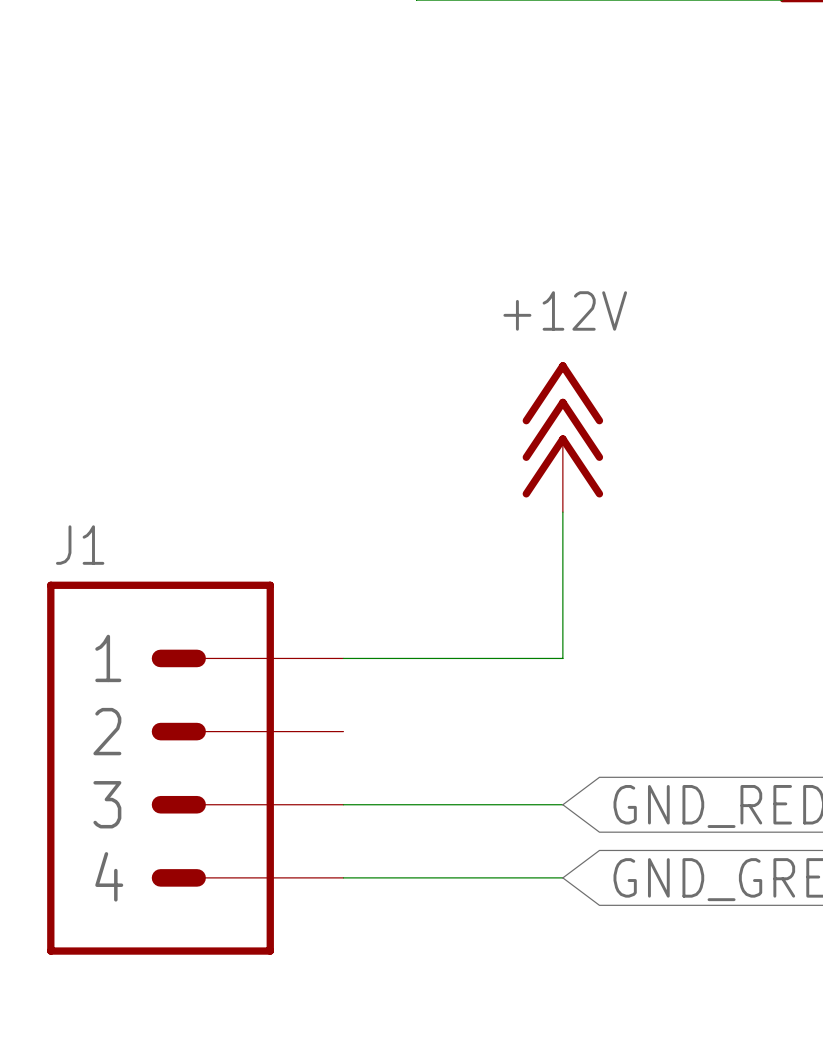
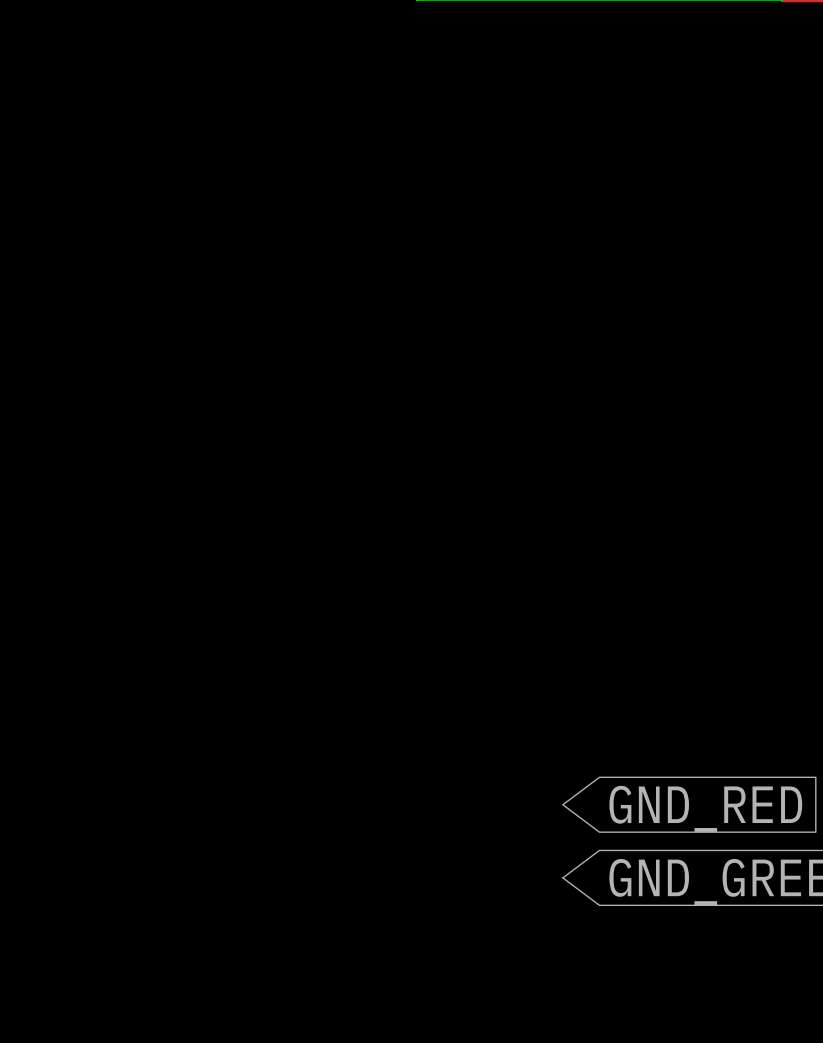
power symbol: +12V (562, 437) -> none
wire: (562, 512) (562, 658) (343, 658) -> none
J1: (195, 768) -> none
wire: (343, 804) (562, 804) -> none
wire: (343, 877) (562, 877) -> none

